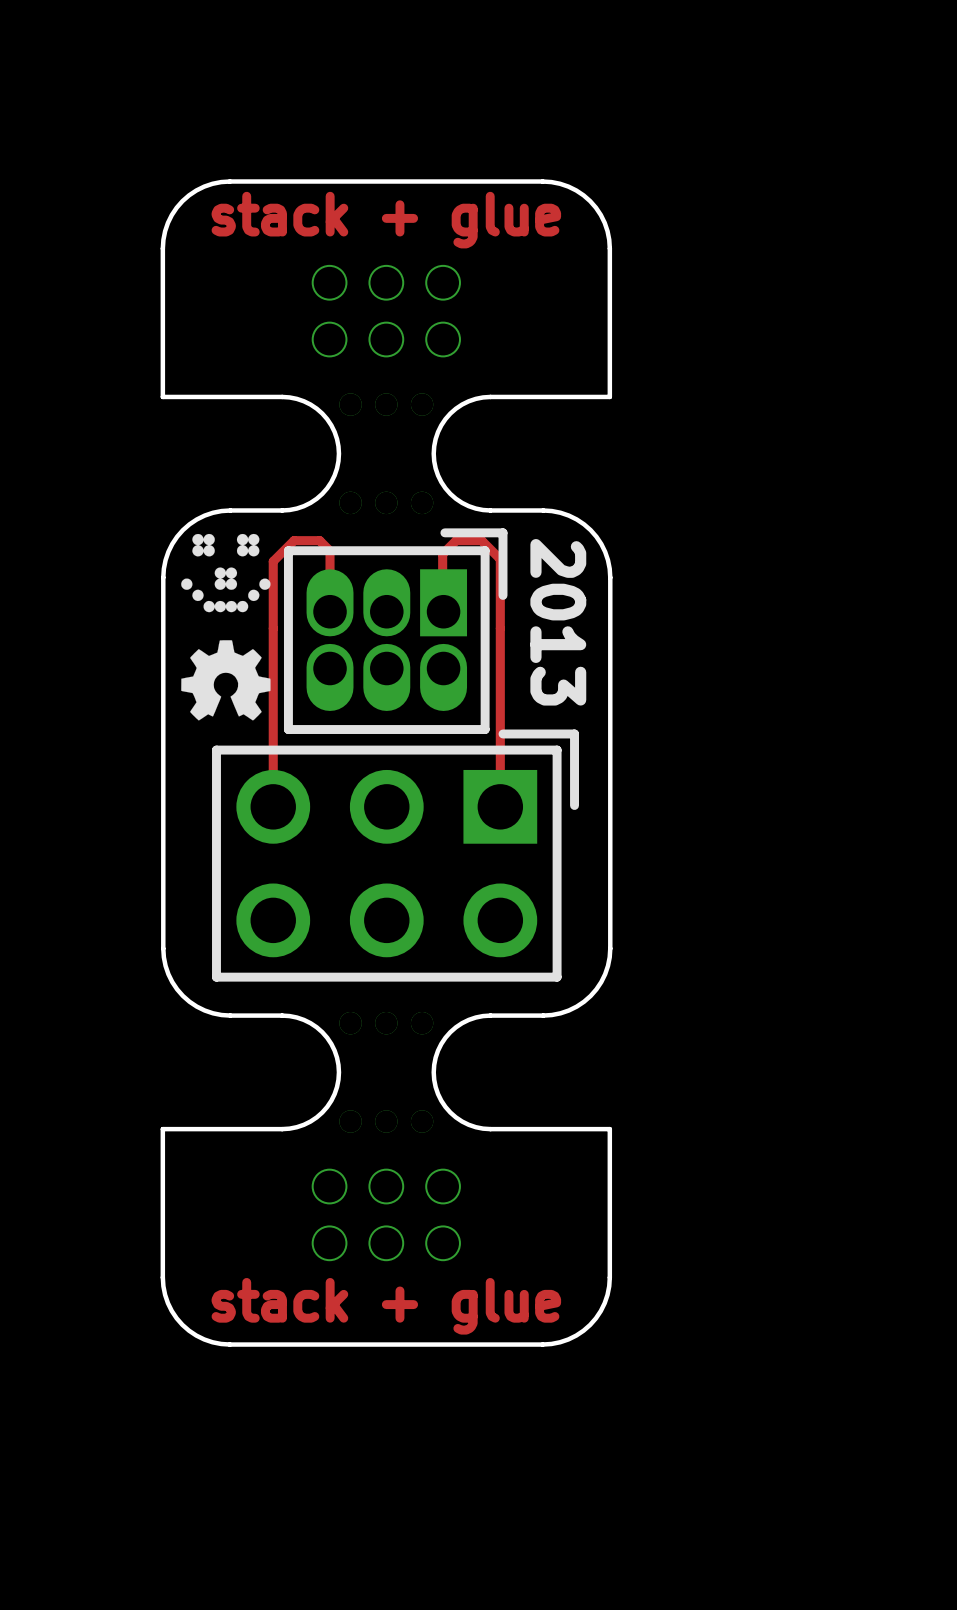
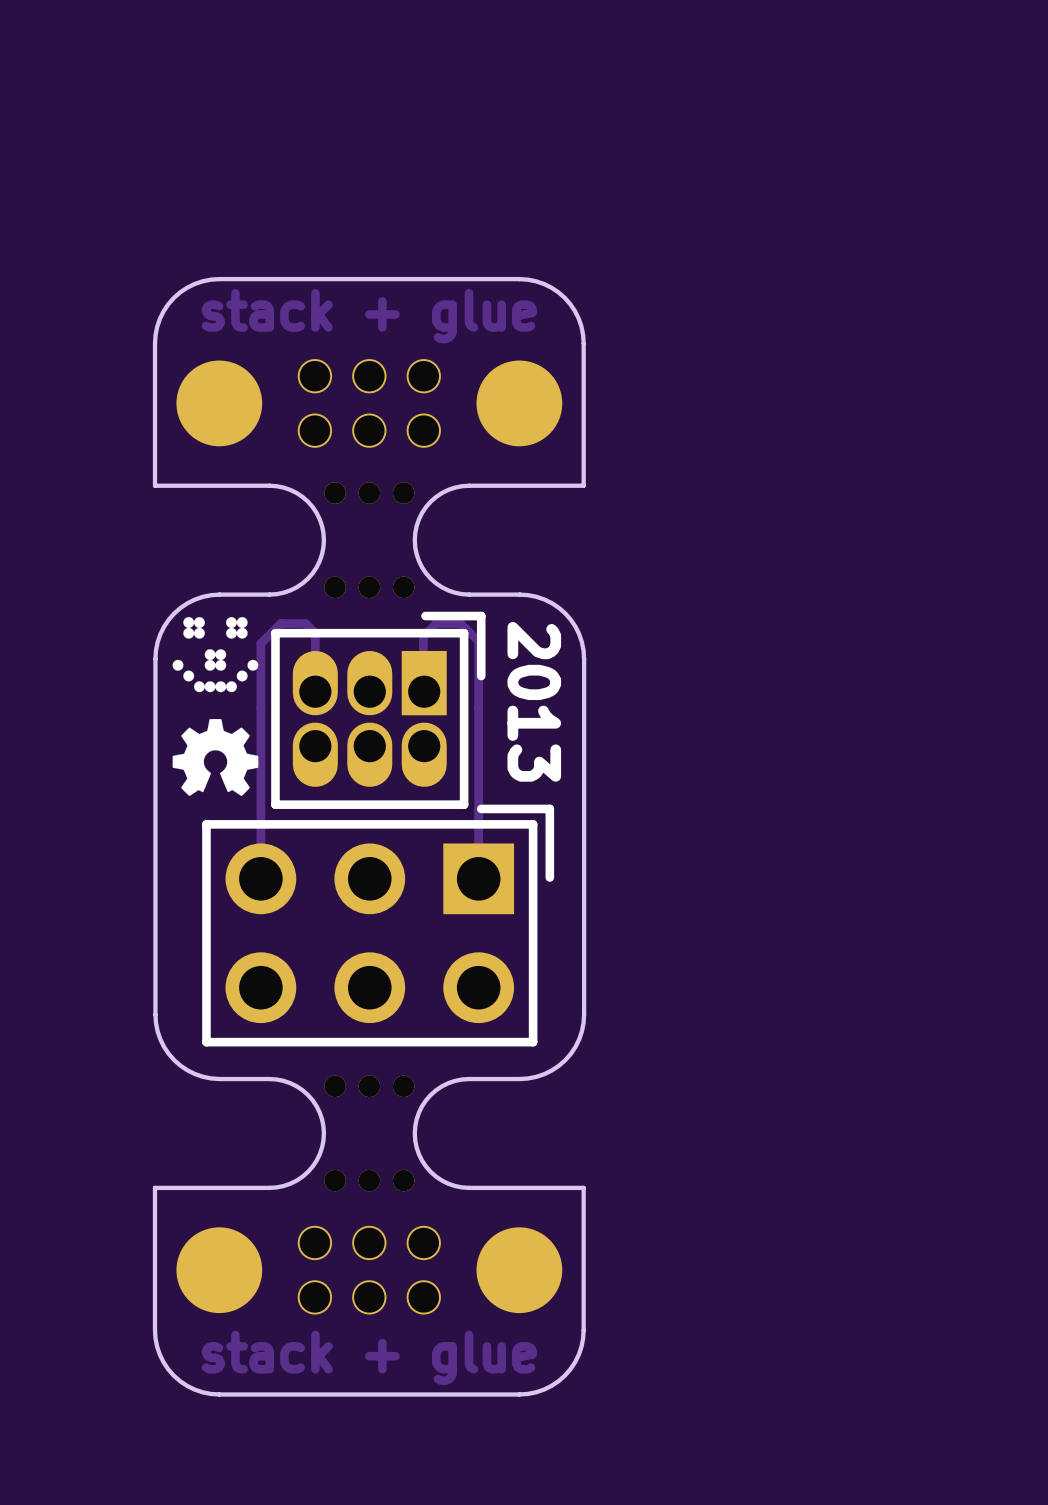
part: none -> (219, 403)
part: none -> (519, 403)
part: none -> (219, 1270)
part: none -> (519, 1270)

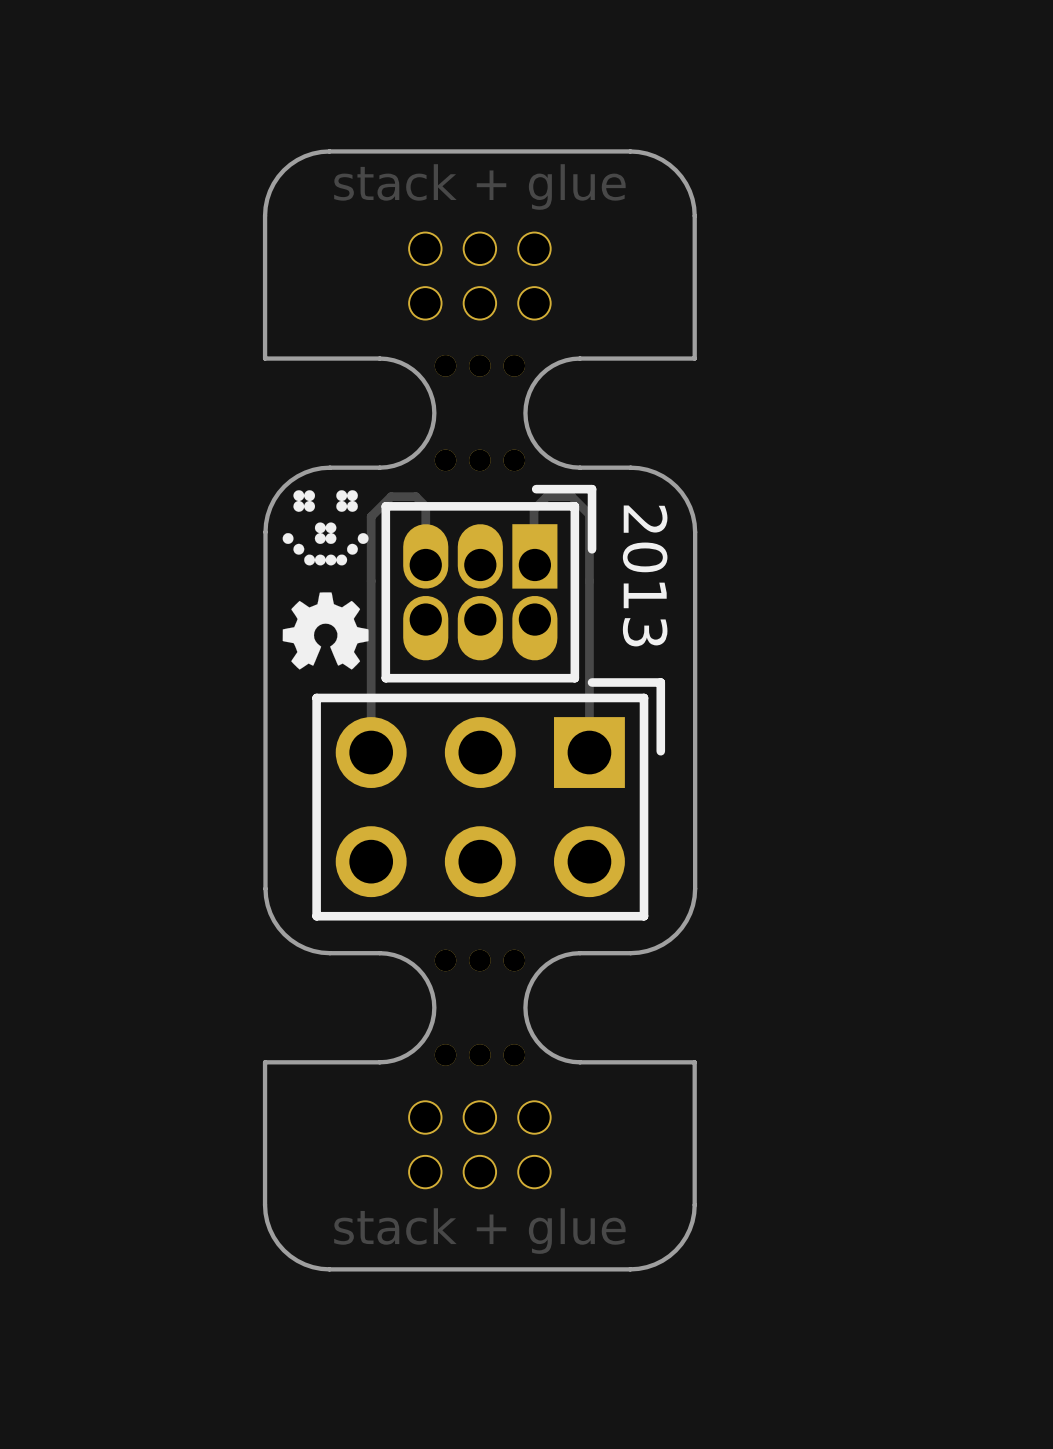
part: (219, 403) -> none
part: (519, 403) -> none
part: (219, 1270) -> none
part: (519, 1270) -> none

